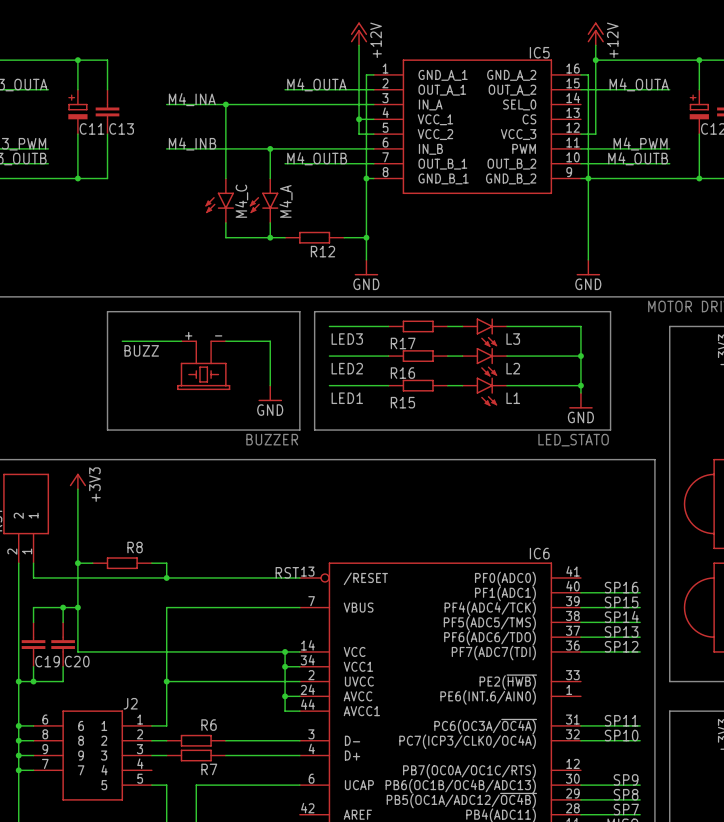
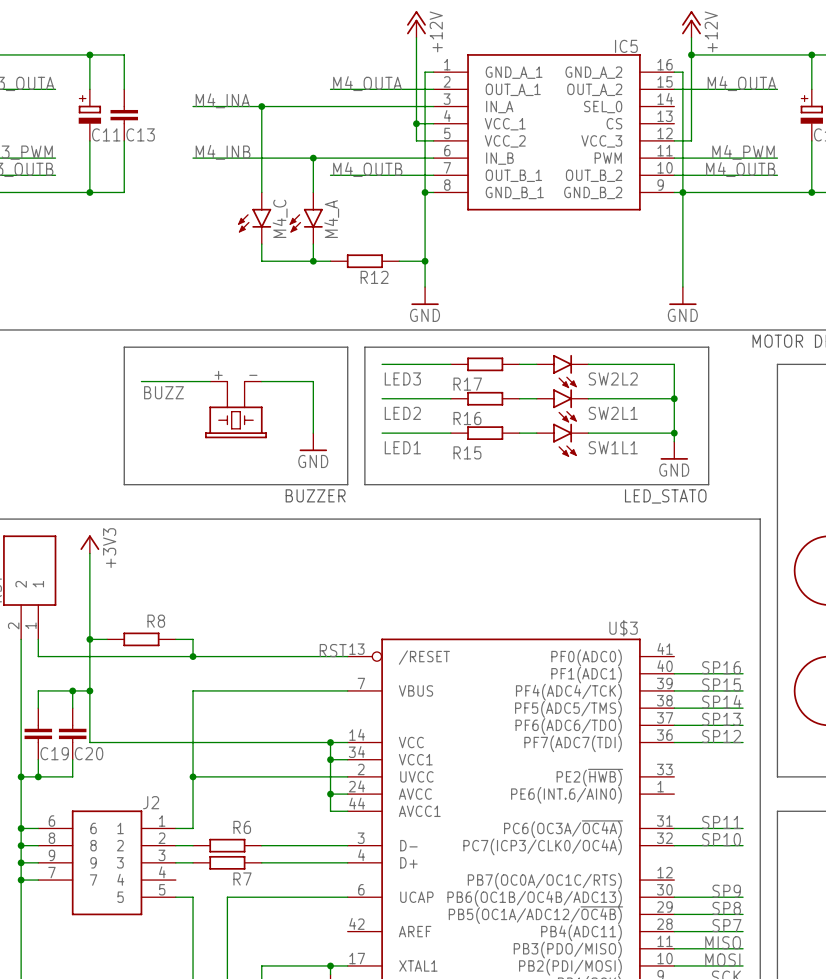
L3 name: L3 (513, 339) -> SW2L2 (613, 378)
L2 name: L2 (513, 368) -> SW2L1 (613, 413)
L1 name: L1 (513, 398) -> SW1L1 (613, 447)
IC6 name: IC6 (539, 553) -> U$3 (623, 628)

